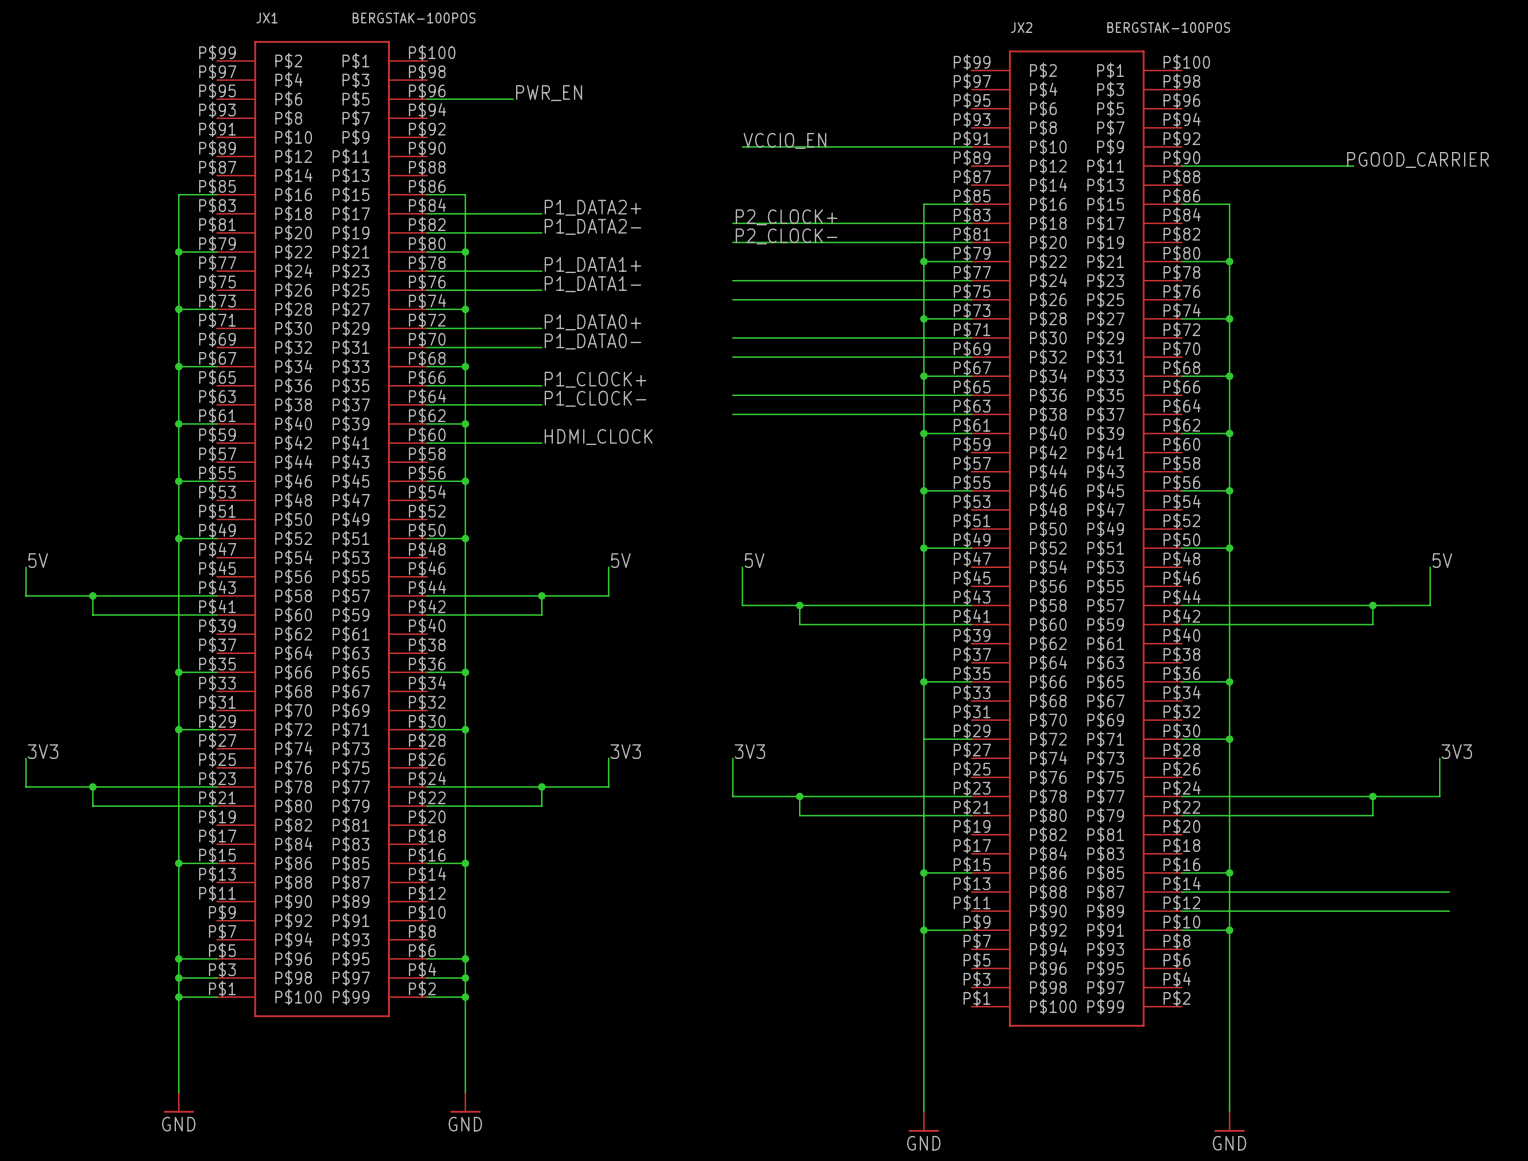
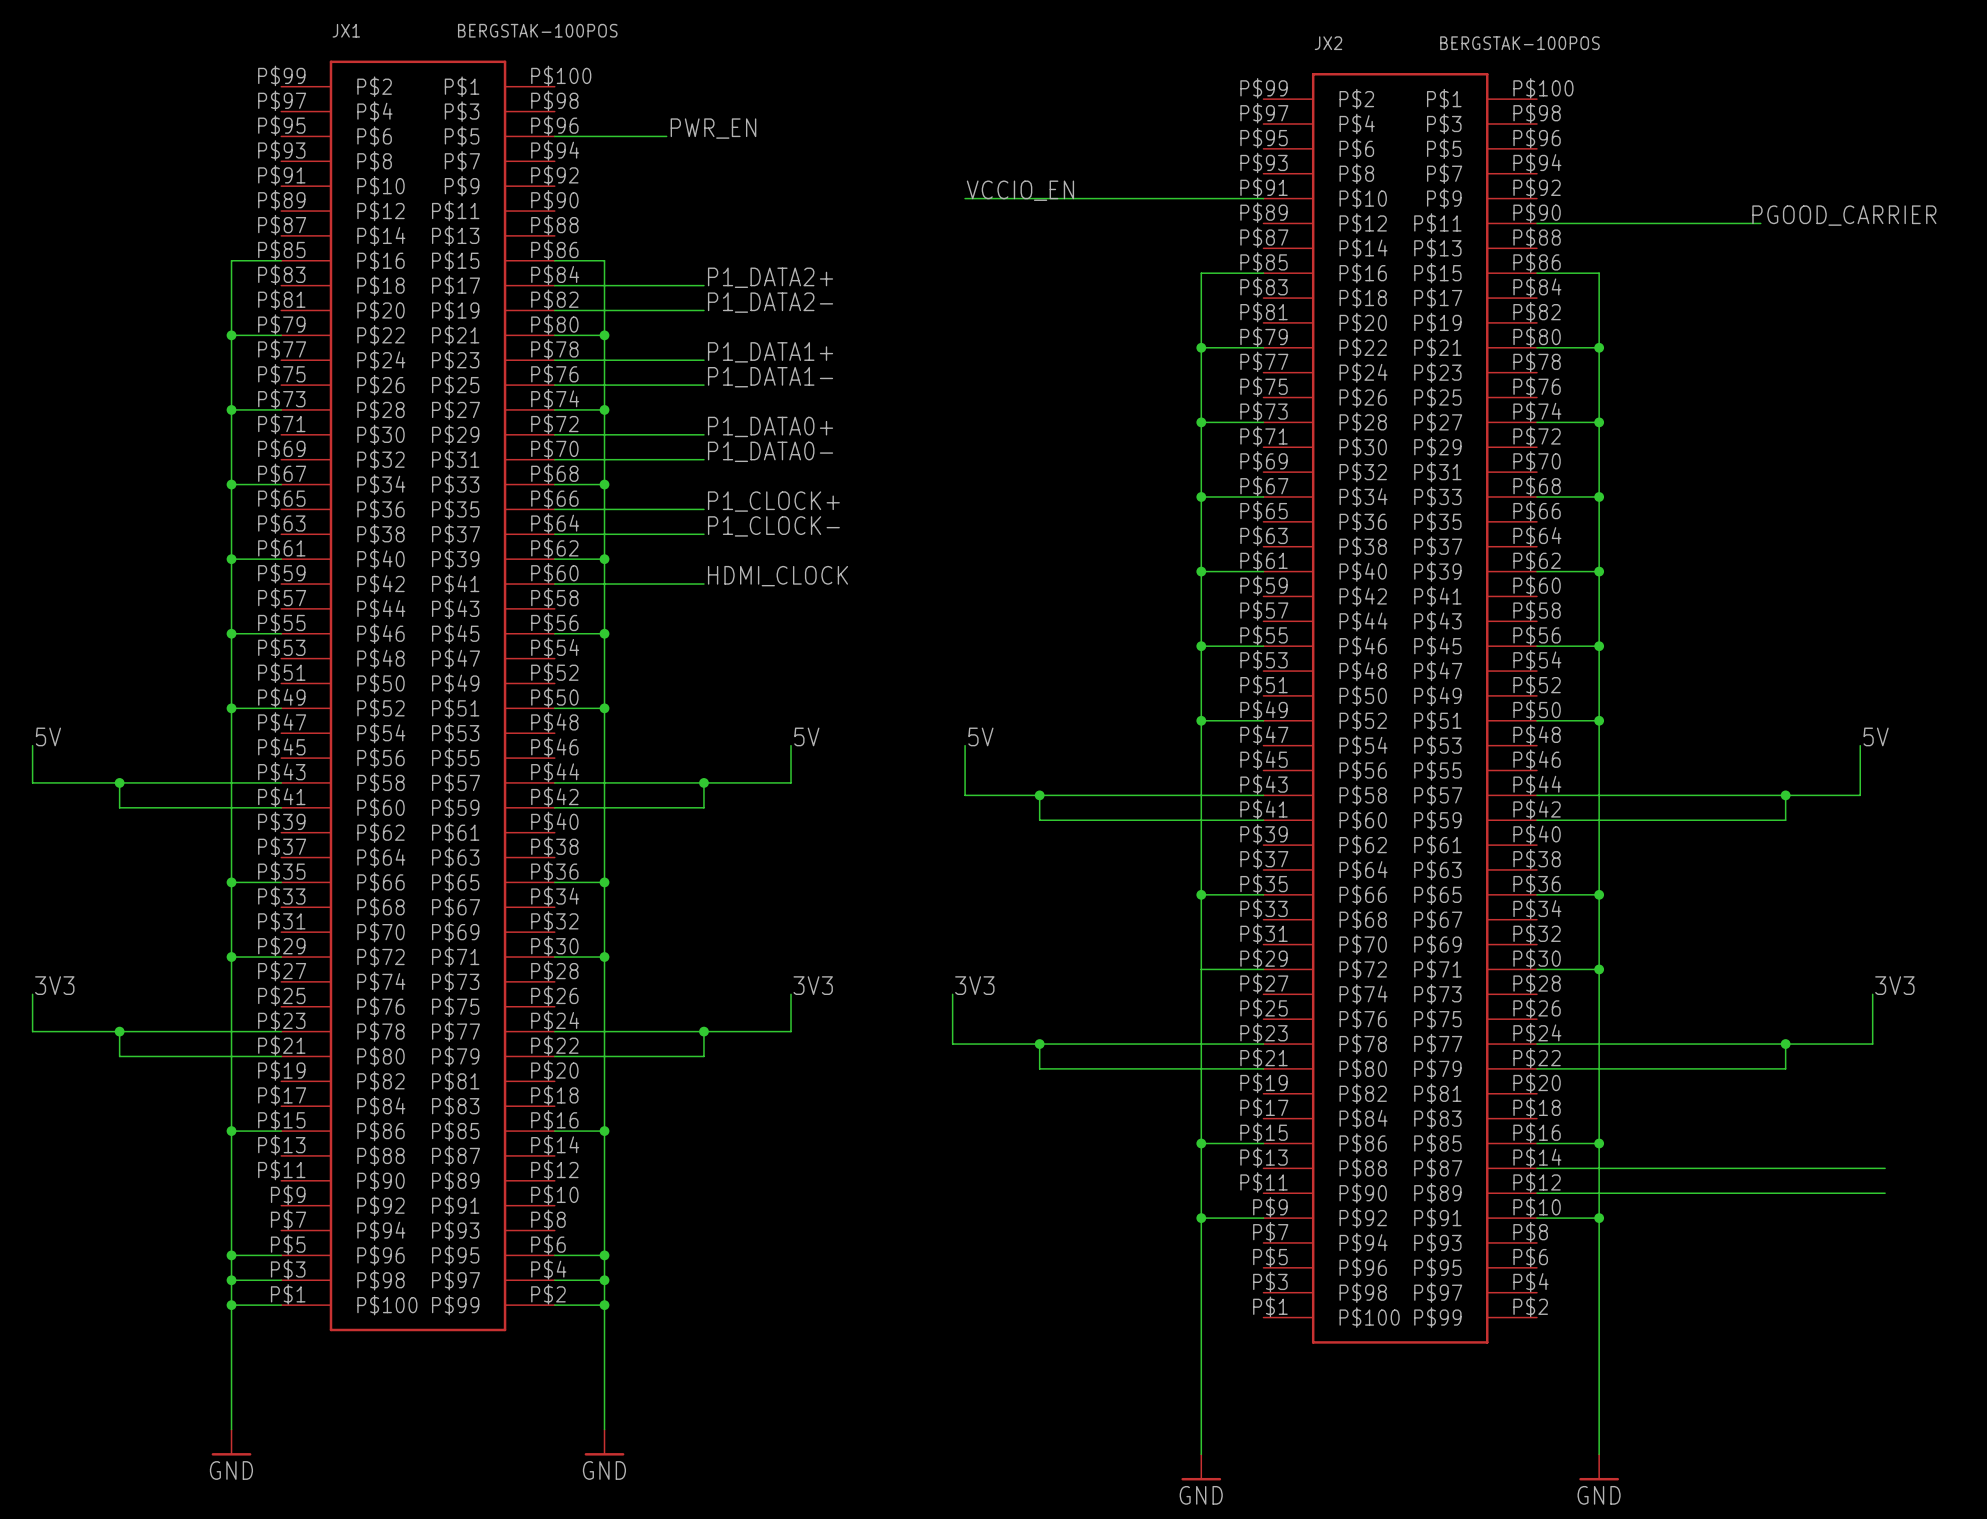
label: P2_CLOCK+ (786, 217) -> none
wire: (732, 223) (971, 223) -> none
label: P2_CLOCK- (786, 236) -> none
wire: (732, 242) (971, 242) -> none
wire: (732, 280) (971, 280) -> none
wire: (732, 299) (971, 299) -> none
wire: (732, 338) (971, 338) -> none
wire: (732, 357) (971, 357) -> none
wire: (732, 395) (971, 395) -> none
wire: (732, 414) (971, 414) -> none

